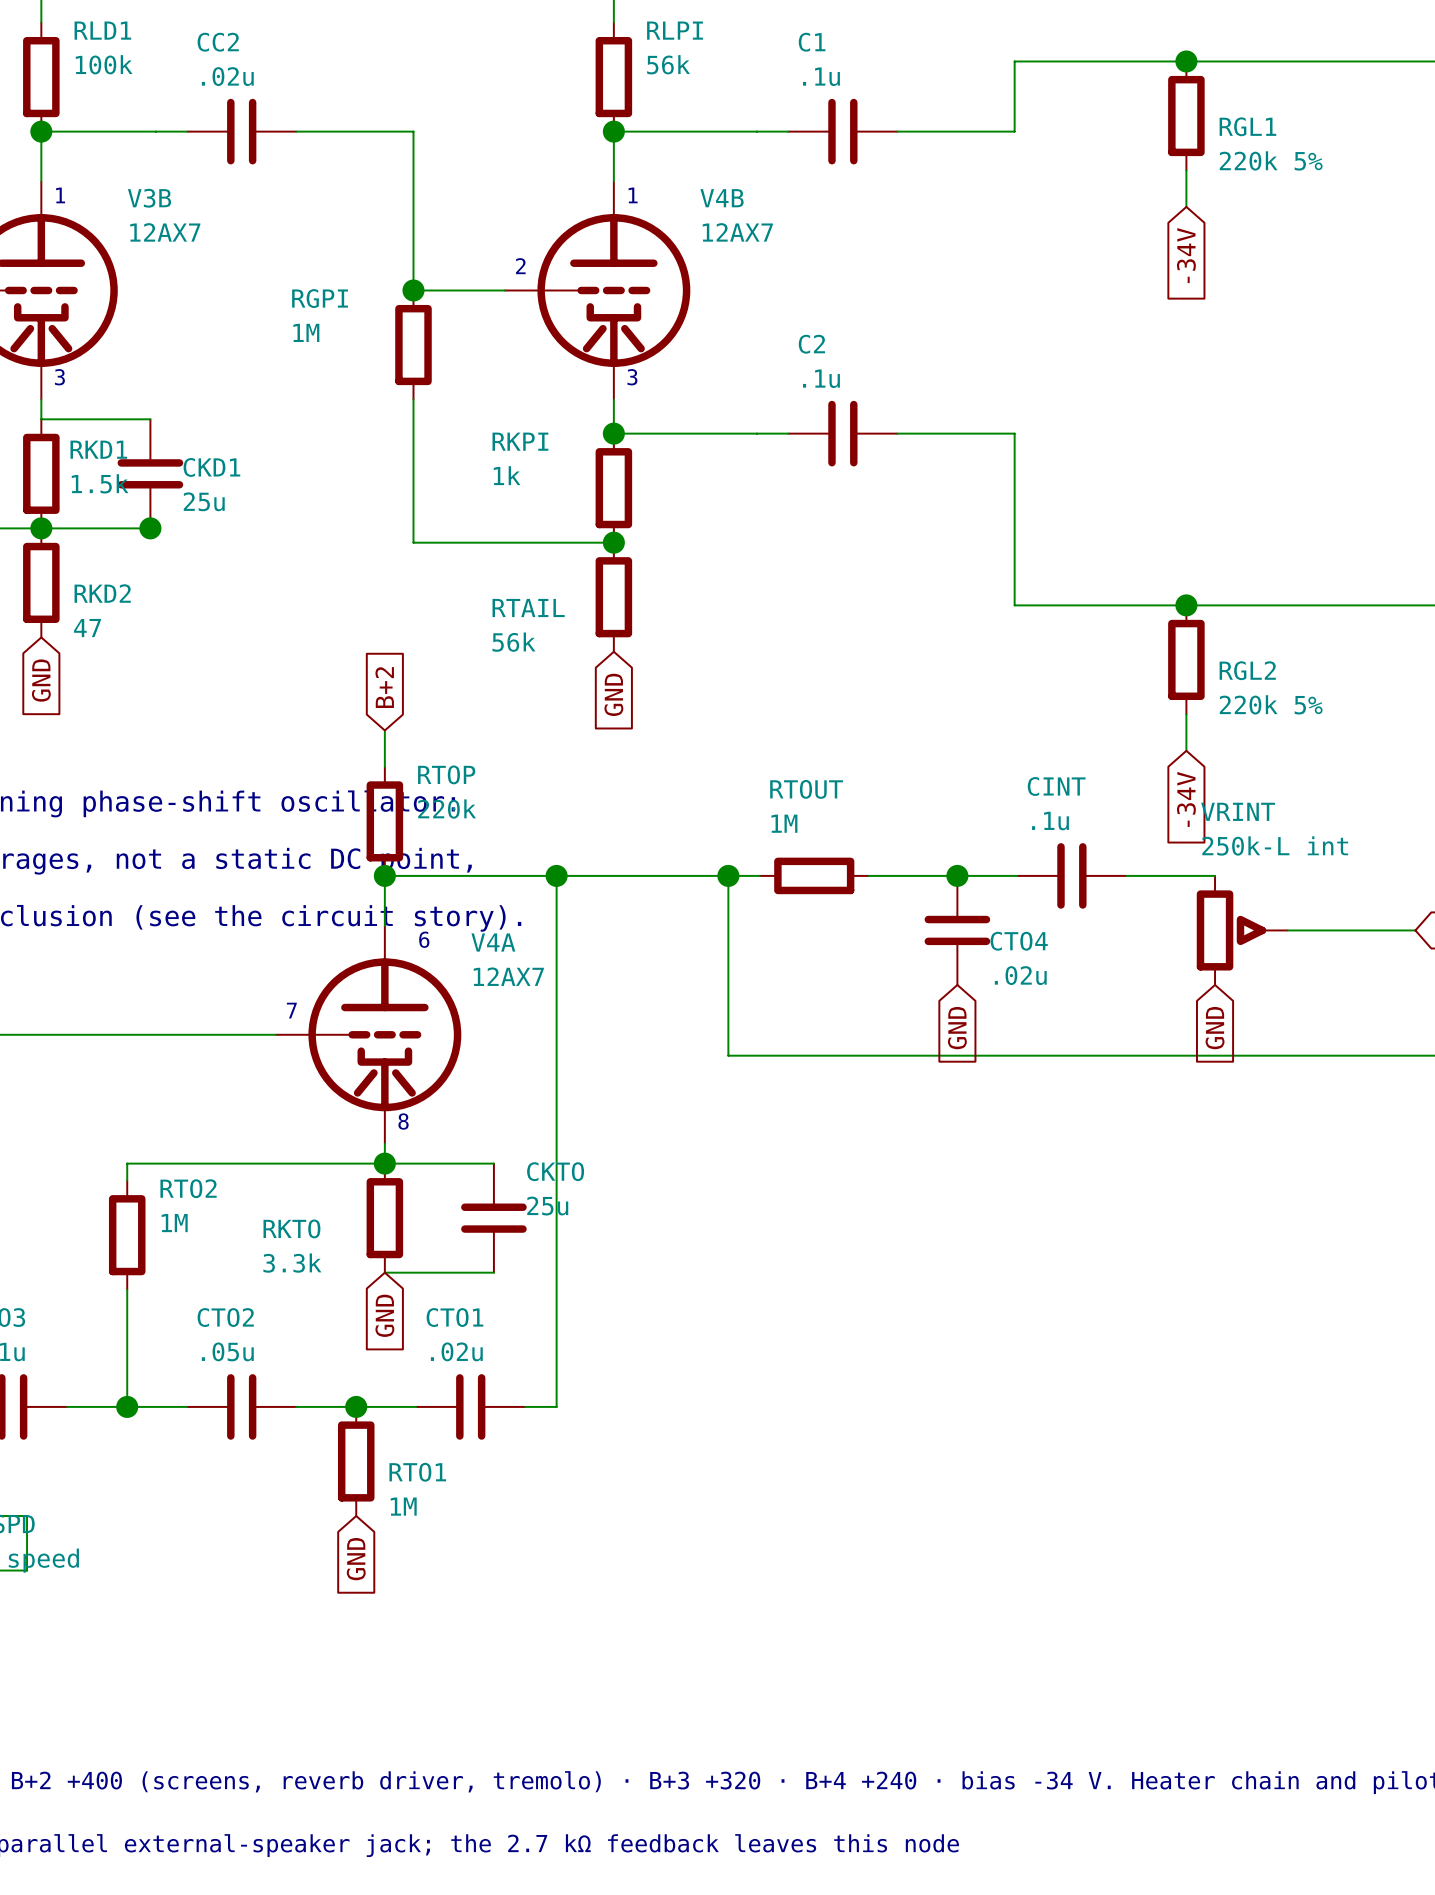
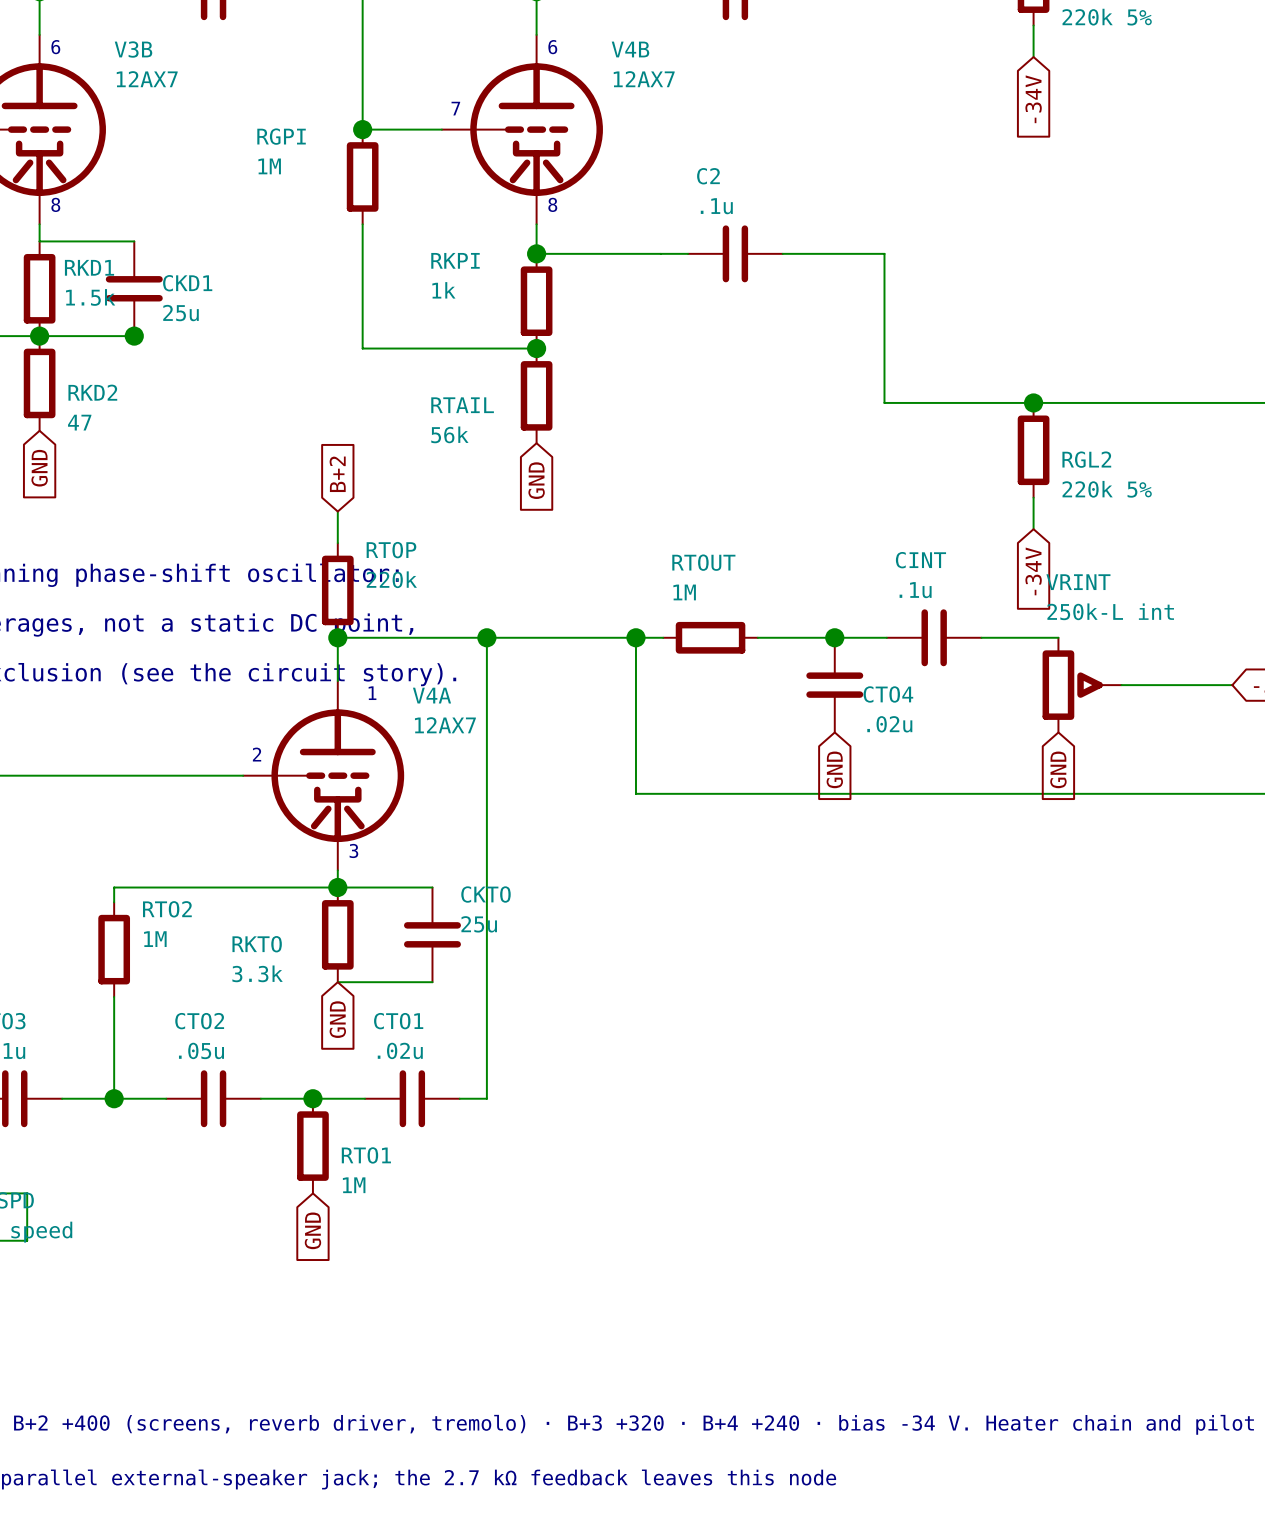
text: 1 (60, 195) -> 6 (55, 47)
text: 1 (633, 195) -> 6 (552, 47)
text: 2 (520, 266) -> 7 (455, 108)
text: 3 (59, 377) -> 8 (55, 204)
text: 3 (632, 377) -> 8 (552, 204)
text: 6 (424, 939) -> 1 (372, 693)
text: 7 (291, 1010) -> 2 (257, 754)
text: 8 (403, 1121) -> 3 (353, 850)

